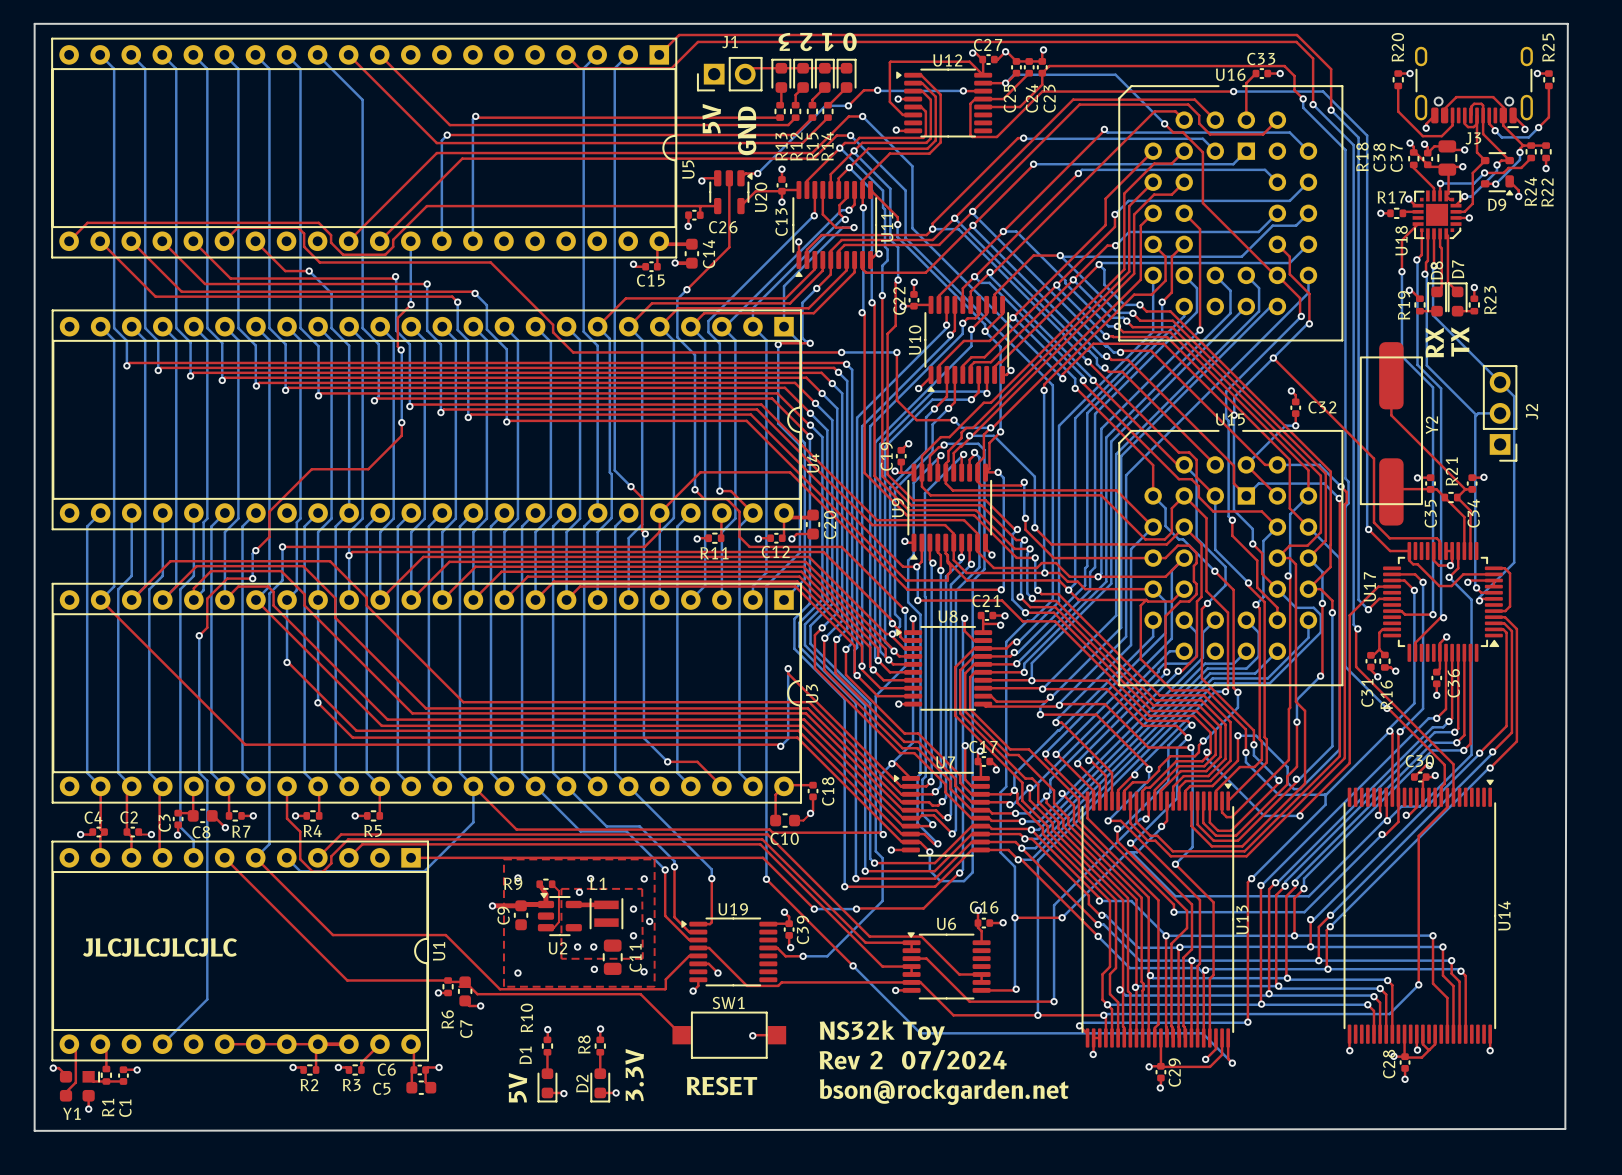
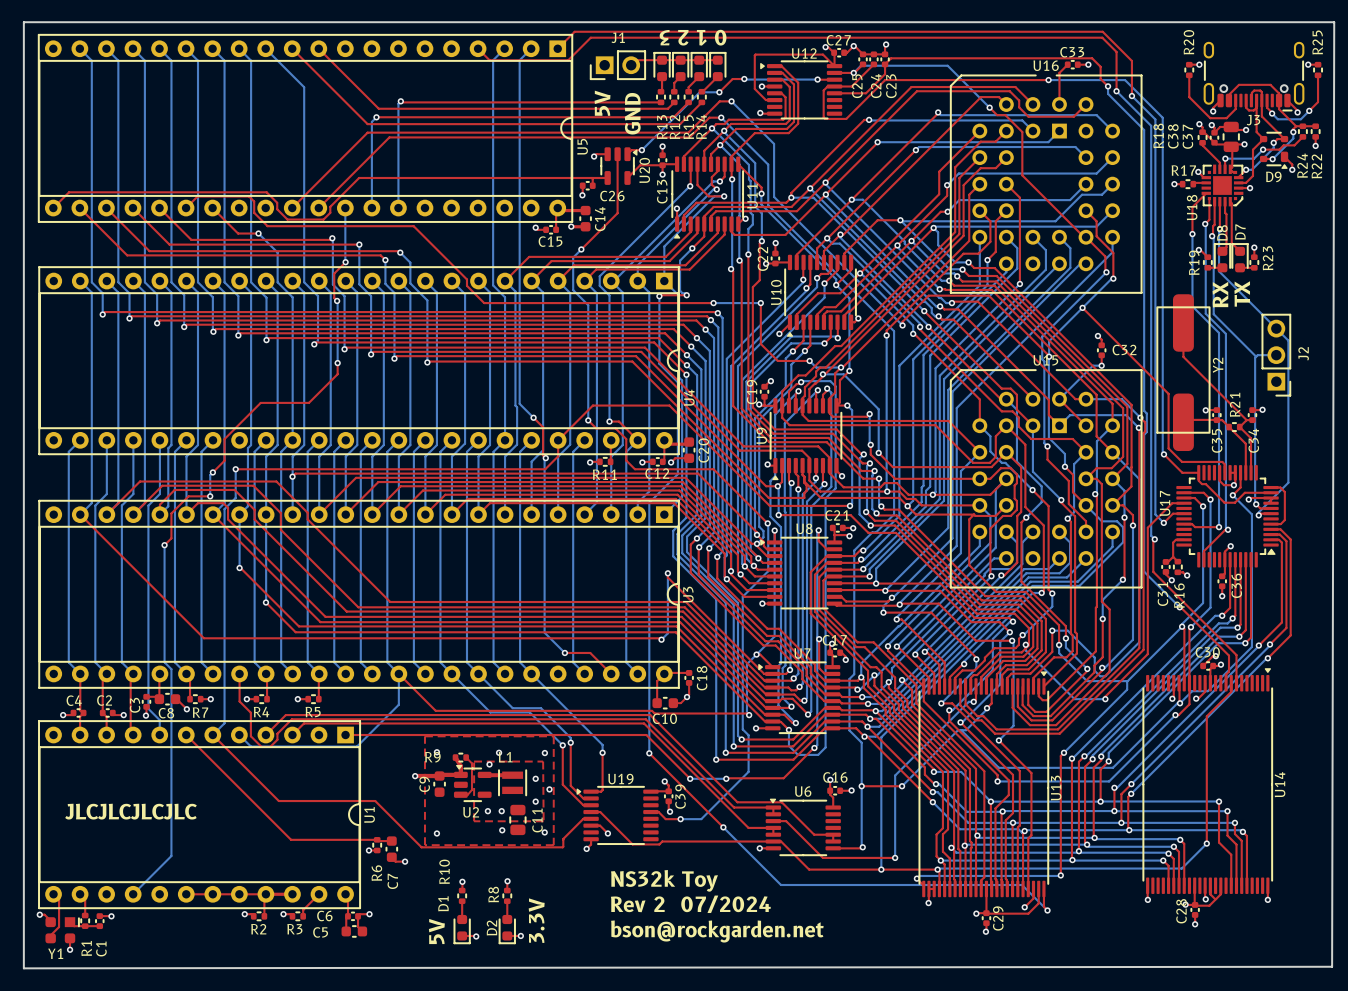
top track: (459, 986) (469, 986) (477, 994) (640, 994) (681, 1035) -> none
text position: NS32k Toy (882, 1032) -> NS32k Toy (664, 880)
SW1: (729, 1035) -> none
via: (752, 1035) -> none
top track: (777, 1035) (752, 1035) -> none
text position: Rev 2 07/2024 (913, 1060) -> Rev 2 07/2024 (690, 904)
text: RESET (721, 1086) -> none
text position: bson@rockgarden.net (944, 1092) -> bson@rockgarden.net (717, 931)

